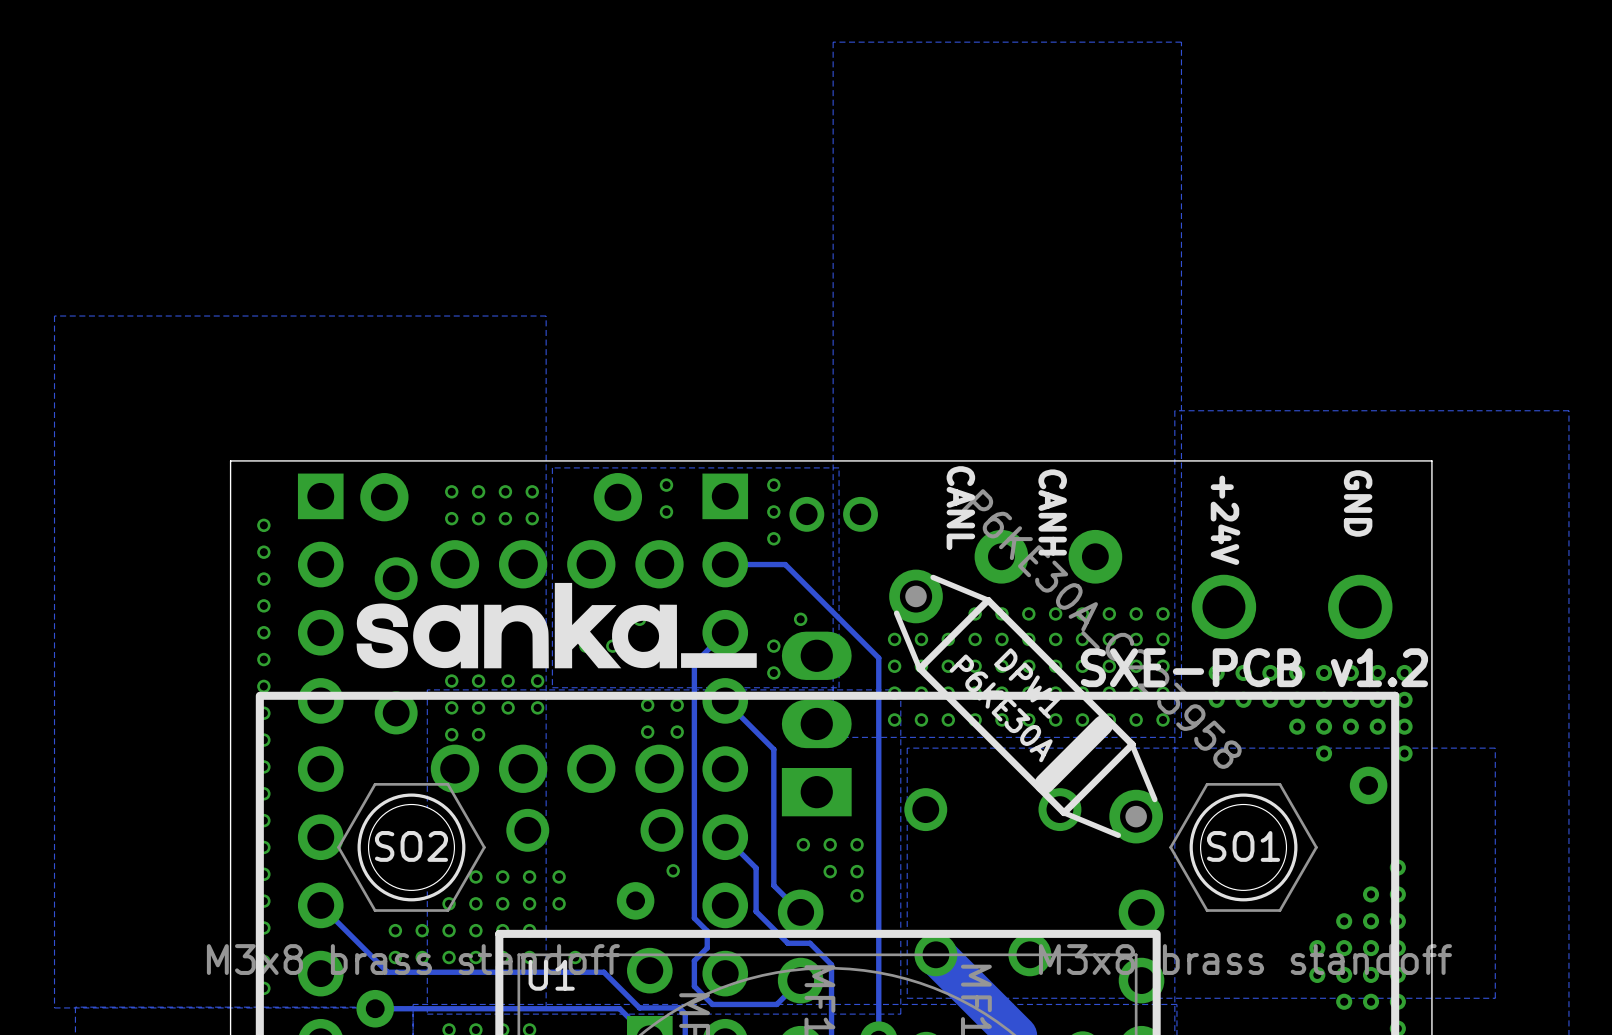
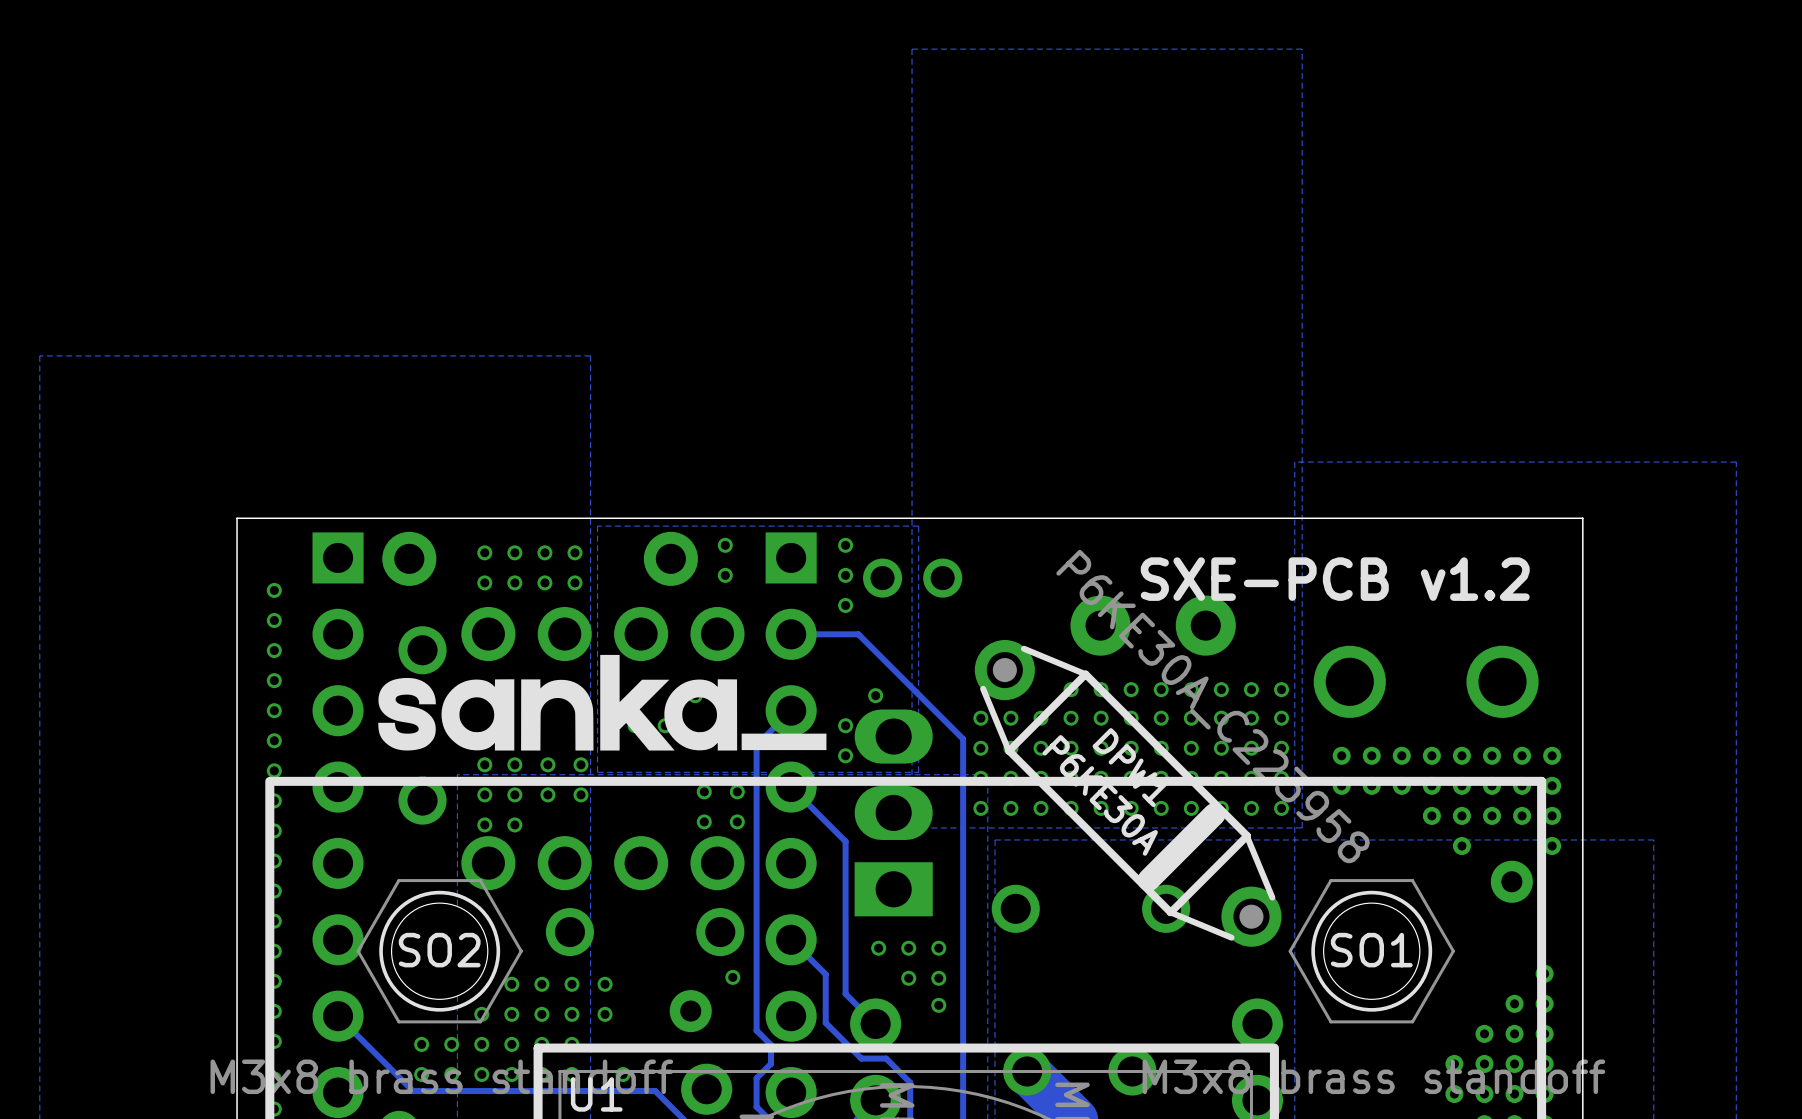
text: GND (1358, 503) -> none
text: CANL (960, 508) -> none
text: CANH (1052, 512) -> none
text: +24V (1225, 520) -> none
text position: SXE-PCB v1.2 (1254, 667) -> SXE-PCB v1.2 (1335, 579)

